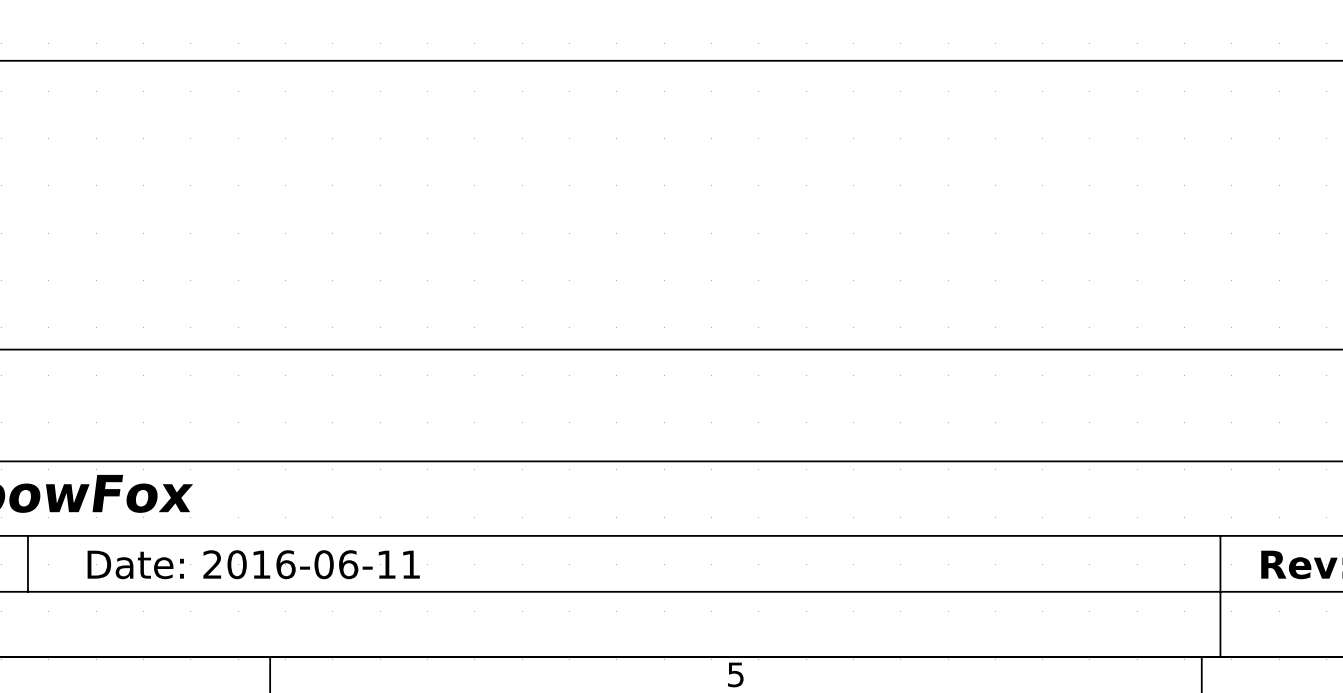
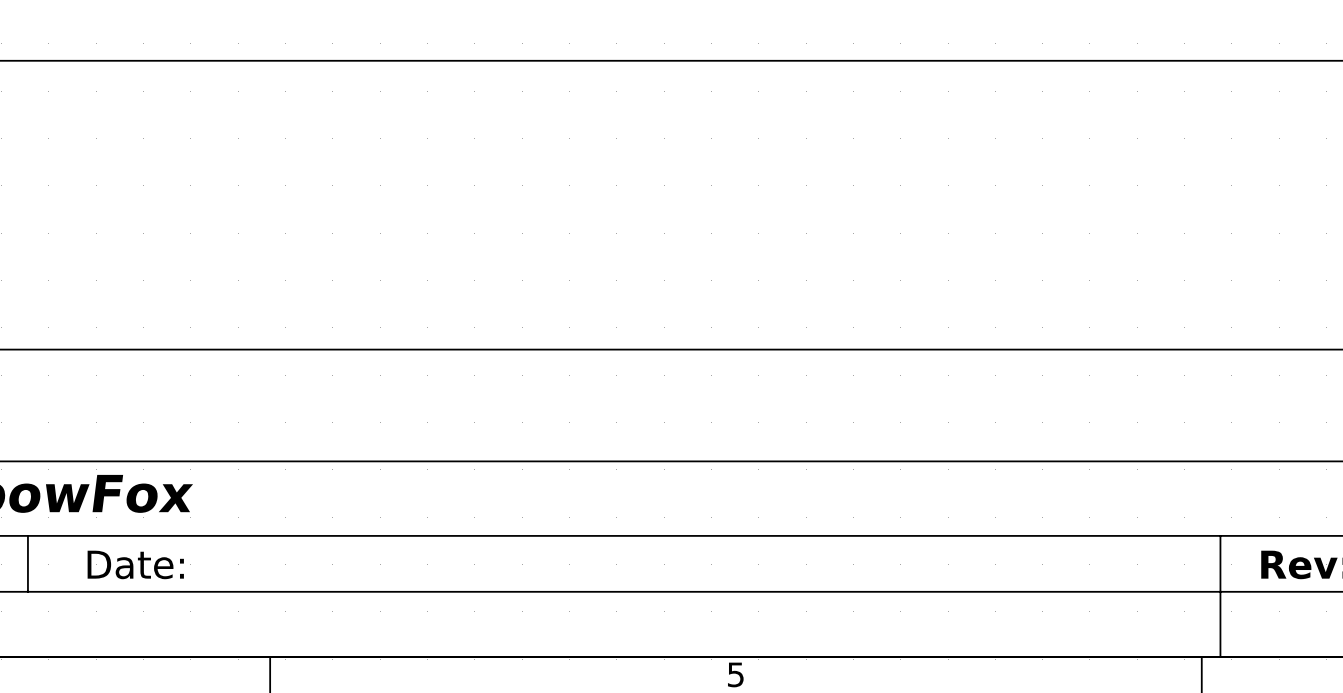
title block: Date: 2016-06-11 (253, 564) -> Date: (135, 564)

